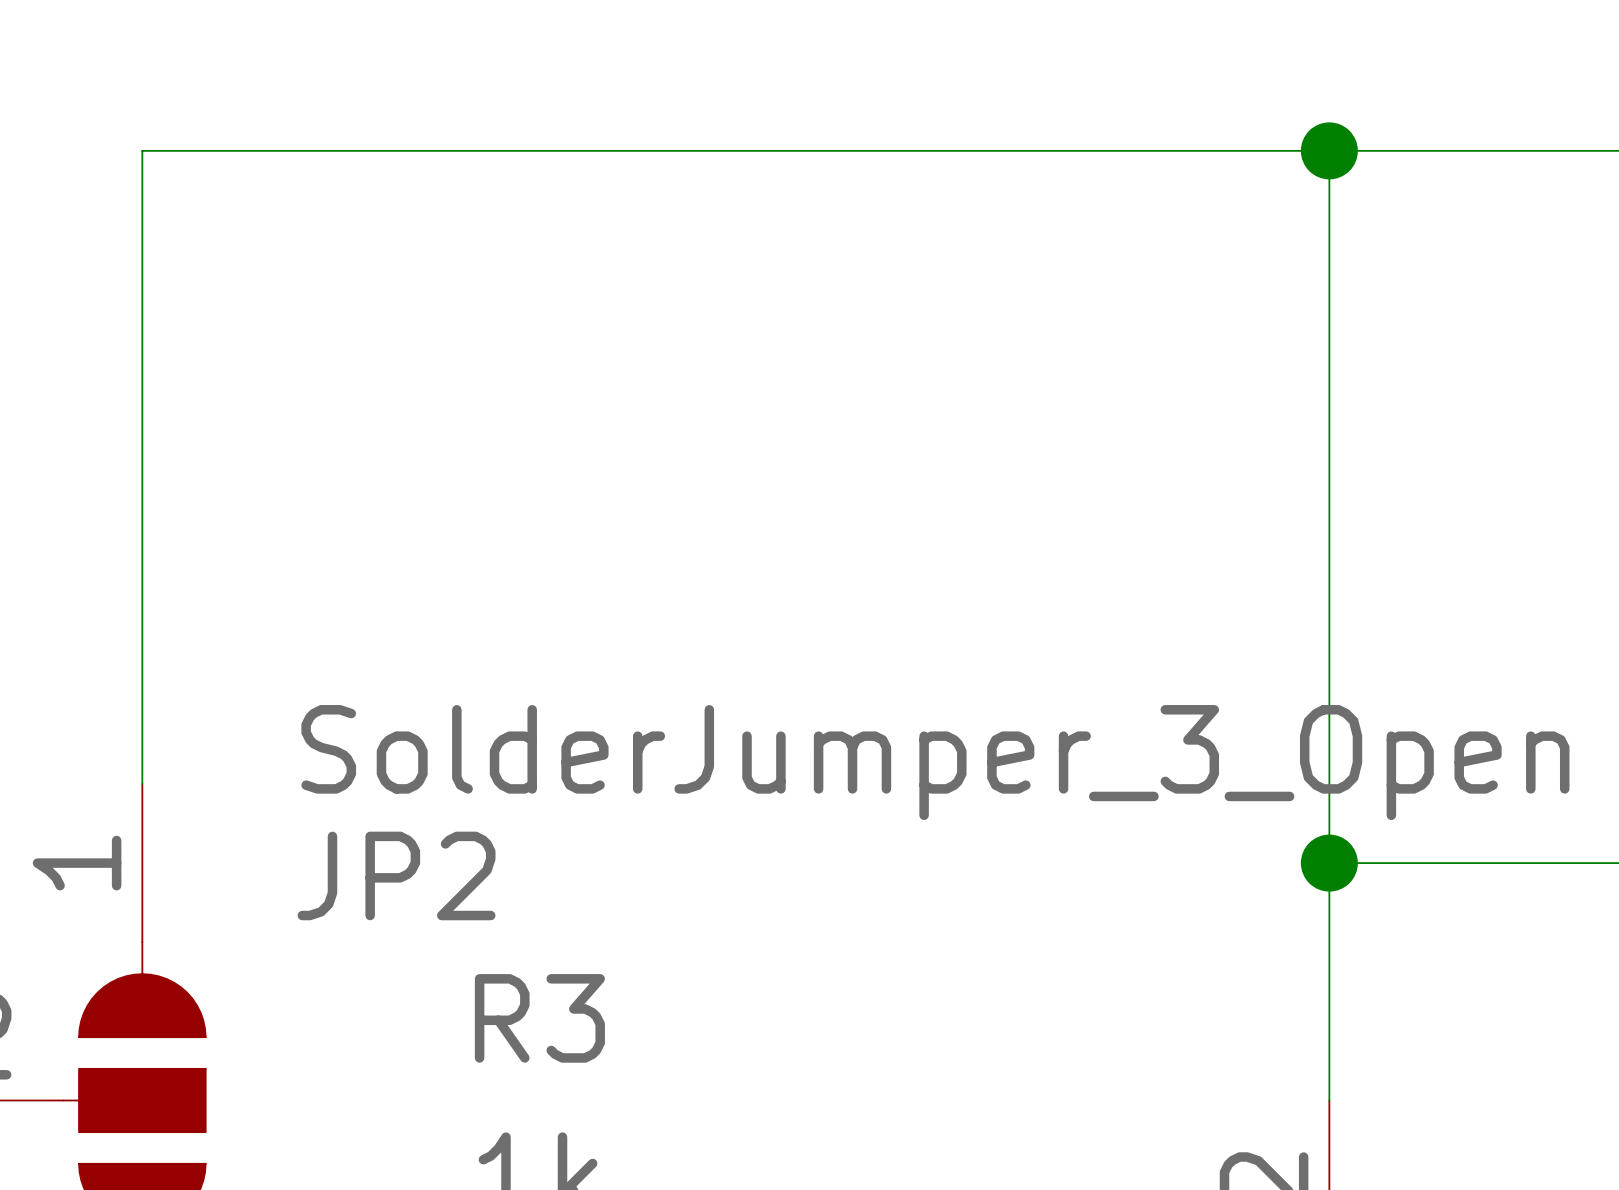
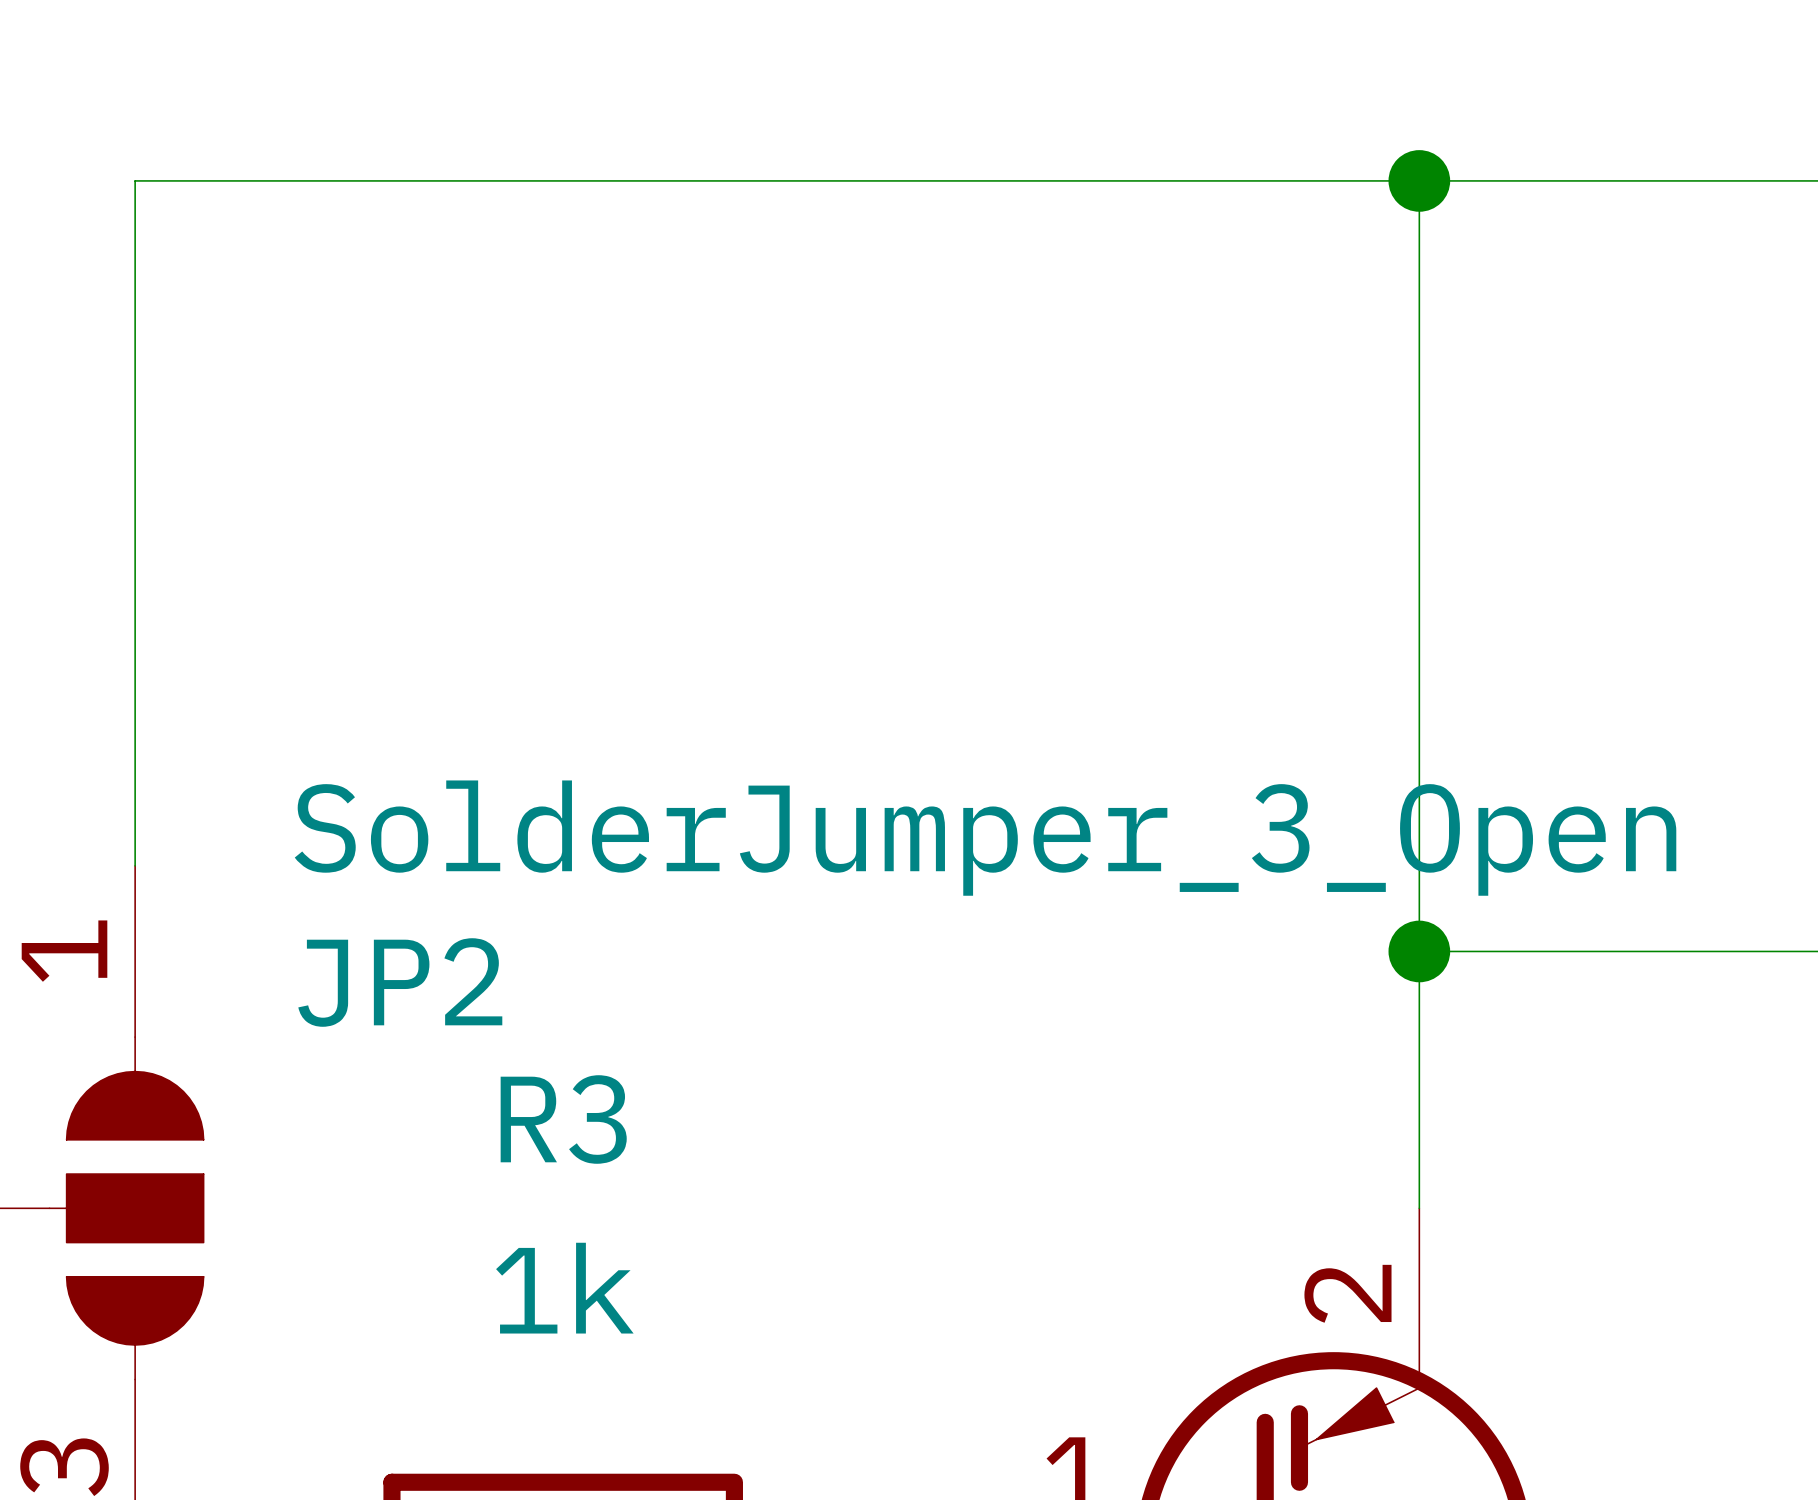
JP2 name position: JP2 (396, 875) -> JP2 (400, 982)

